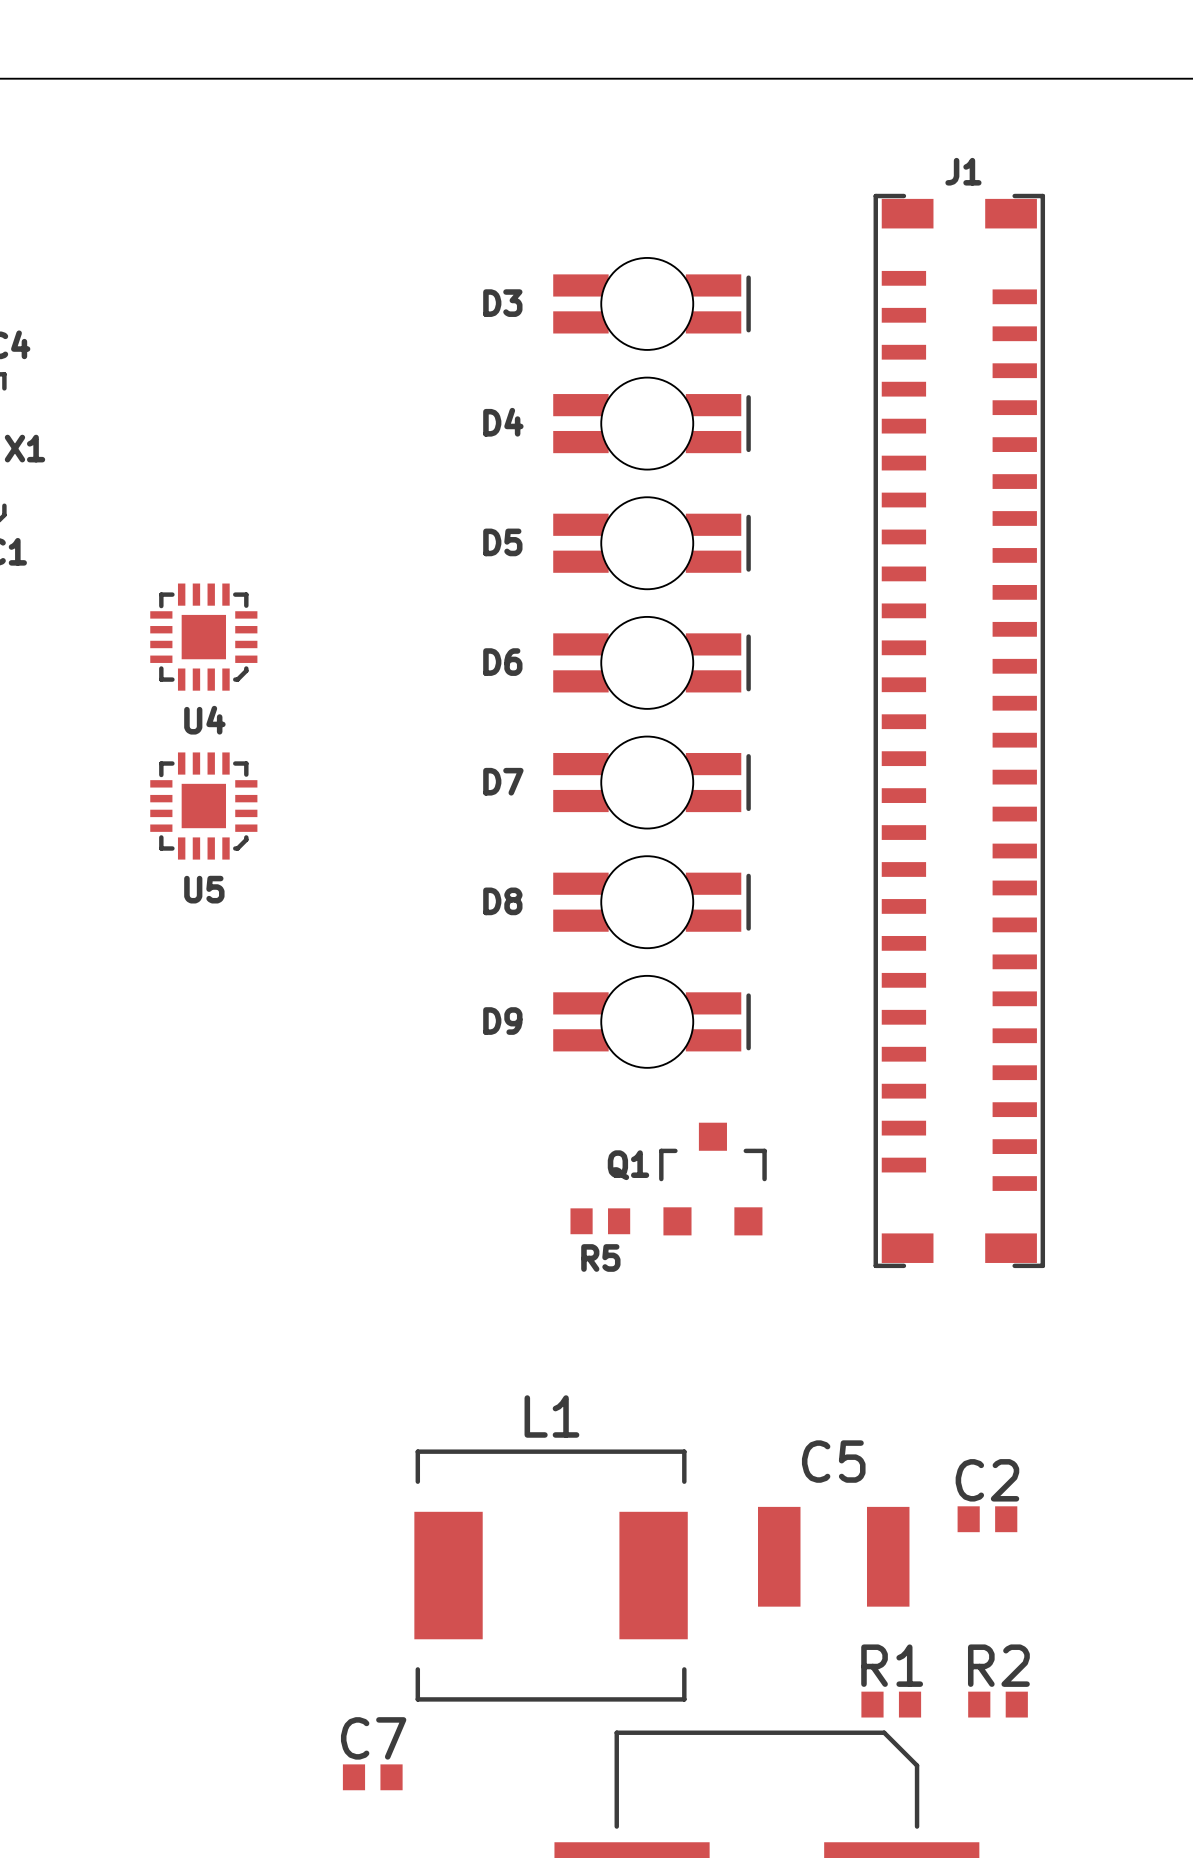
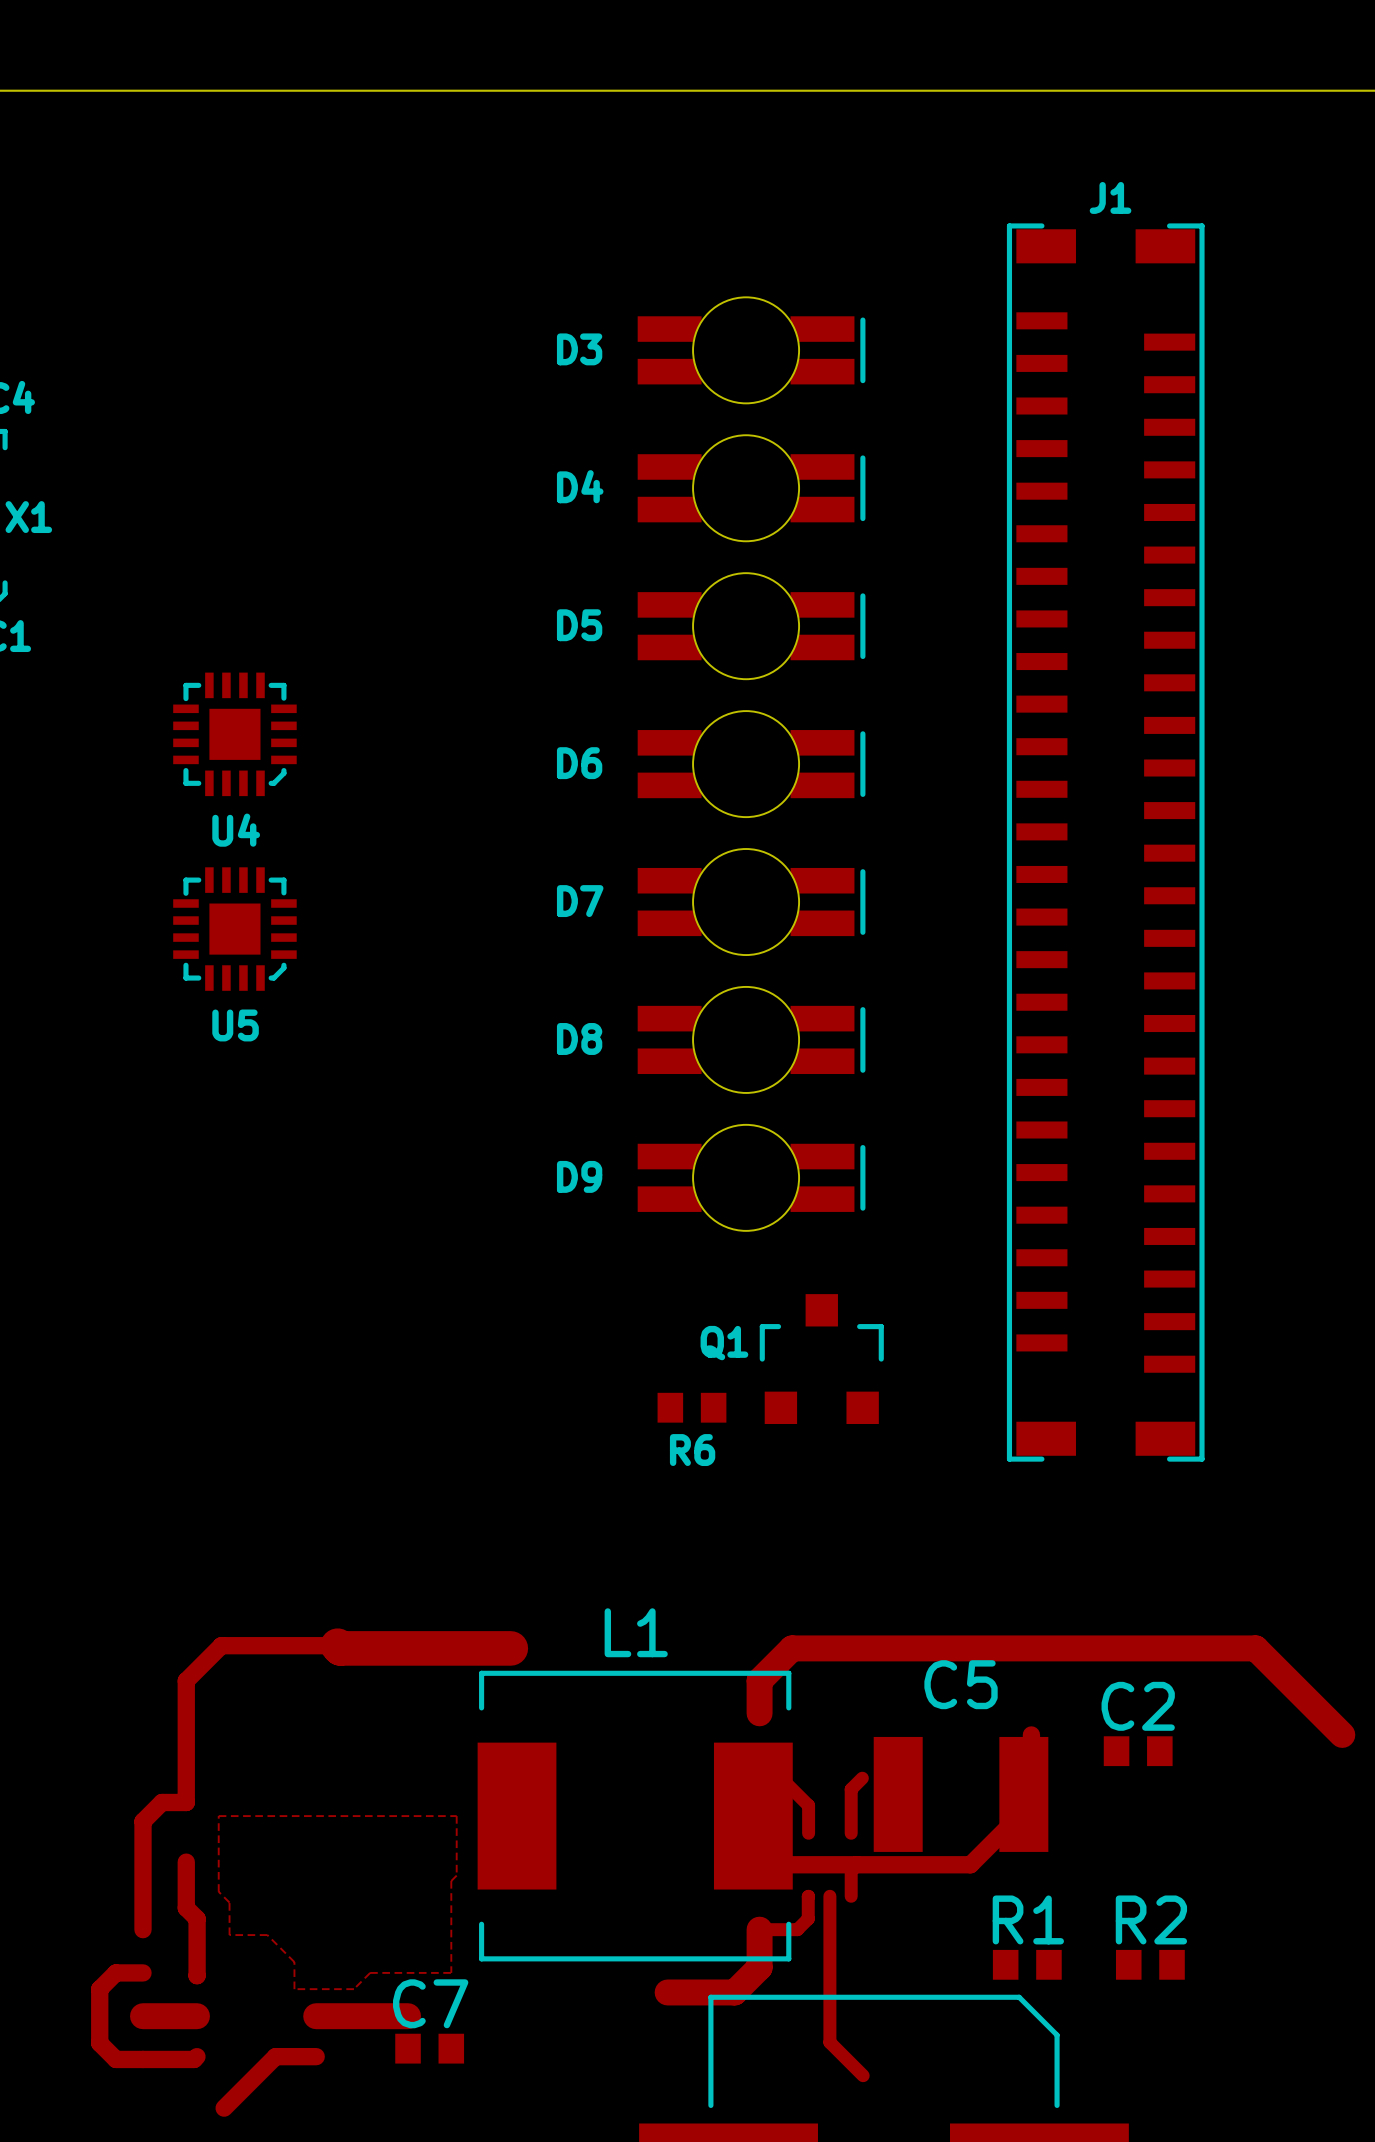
R5 name: R5 (600, 1257) -> R6 (692, 1450)
track: none -> (510, 1648) (340, 1648) (337, 1645) (221, 1645) (186, 1680) (186, 1802) (162, 1802) (143, 1821) (143, 1929)
track: none -> (759, 1713) (759, 1680) (792, 1648) (1255, 1648) (1342, 1734)
track: none -> (1031, 1734) (1031, 1803) (970, 1864) (759, 1864)
track: none -> (759, 1778) (781, 1778) (808, 1805) (808, 1833)
track: none -> (862, 1778) (851, 1789) (851, 1833)
zone outline: none -> (218, 1816) (218, 1891) (229, 1902) (229, 1935) (267, 1935) (294, 1962) (294, 1989) (353, 1989) (370, 1972) (451, 1972) (451, 1880) (456, 1875) (456, 1816) (218, 1816)
track: none -> (186, 1862) (186, 1908) (197, 1918) (197, 1975)
track: none -> (856, 1864) (851, 1870) (851, 1896)
track: none -> (808, 1896) (808, 1918) (797, 1929) (759, 1929) (759, 1967) (734, 1992) (667, 1992)
track: none -> (829, 1896) (829, 2042) (863, 2075)
track: none -> (143, 1972) (115, 1972) (99, 1989) (99, 2043) (115, 2059) (194, 2059) (196, 2056)
track: none -> (143, 2016) (196, 2016)
track: none -> (316, 2016) (408, 2016)
track: none -> (316, 2056) (275, 2056) (224, 2108)

